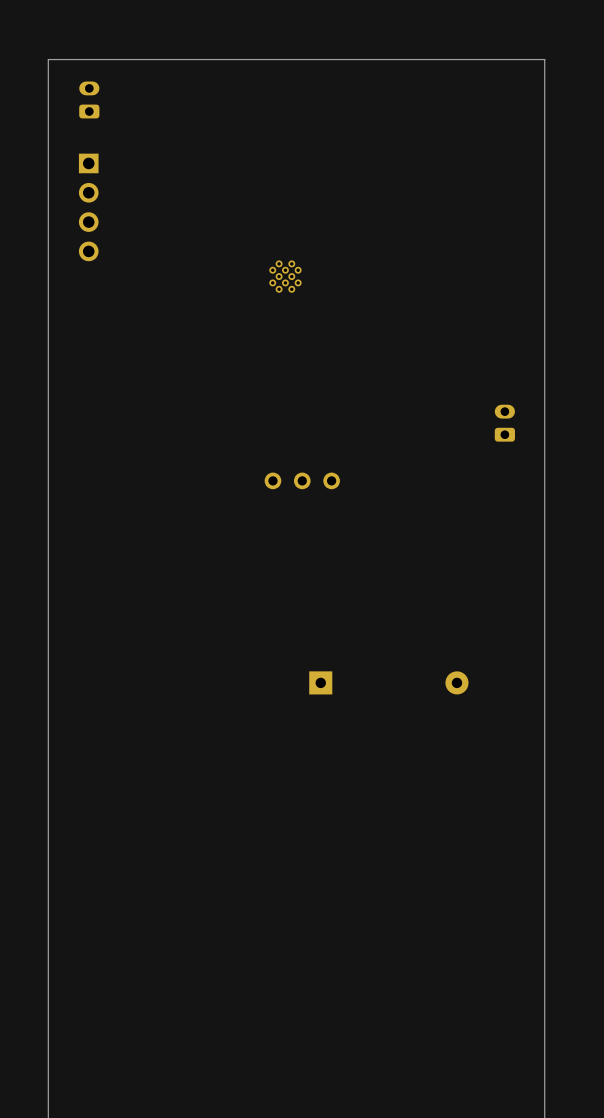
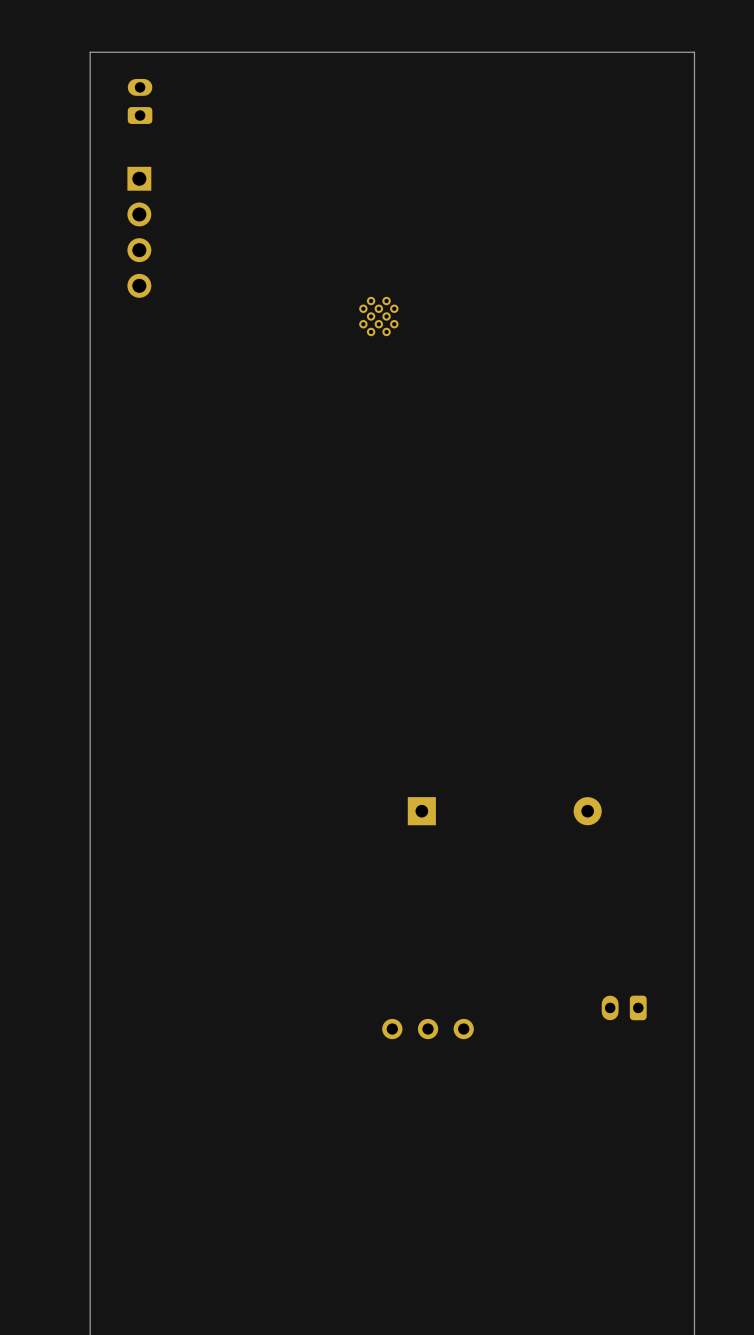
part: (504, 423) -> none
part: (302, 480) -> none
part: none -> (624, 1007)
part: none -> (428, 1029)

